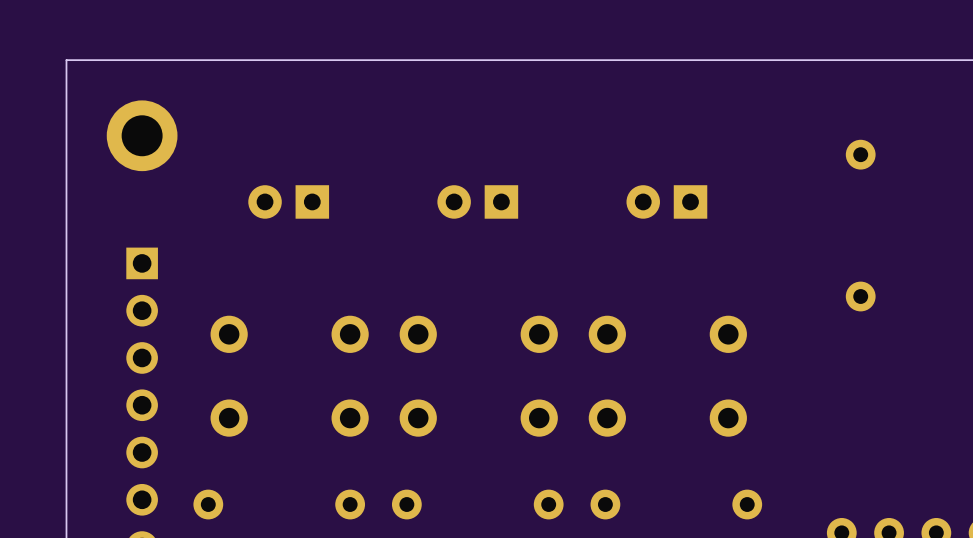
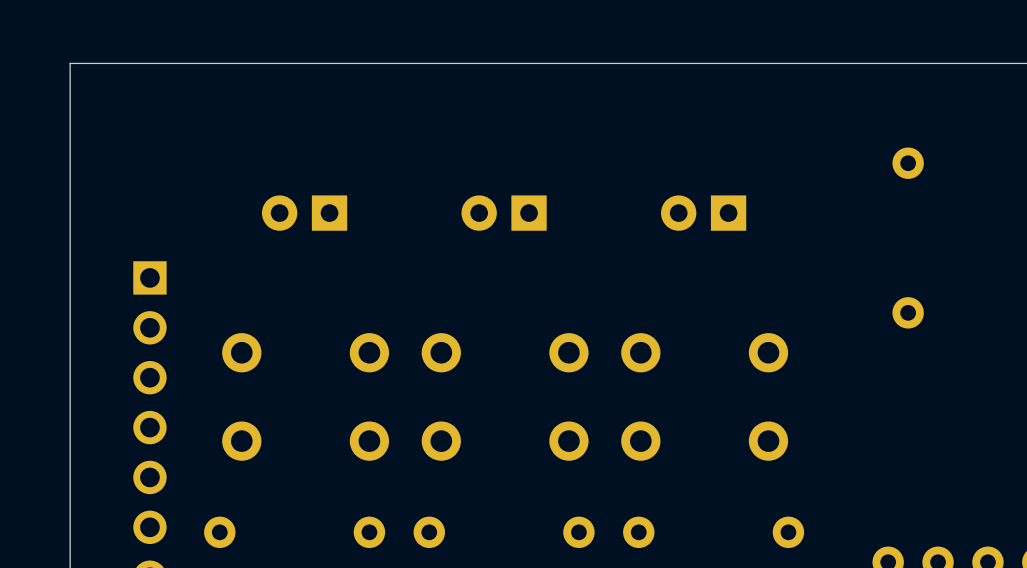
part: (142, 135) -> none

